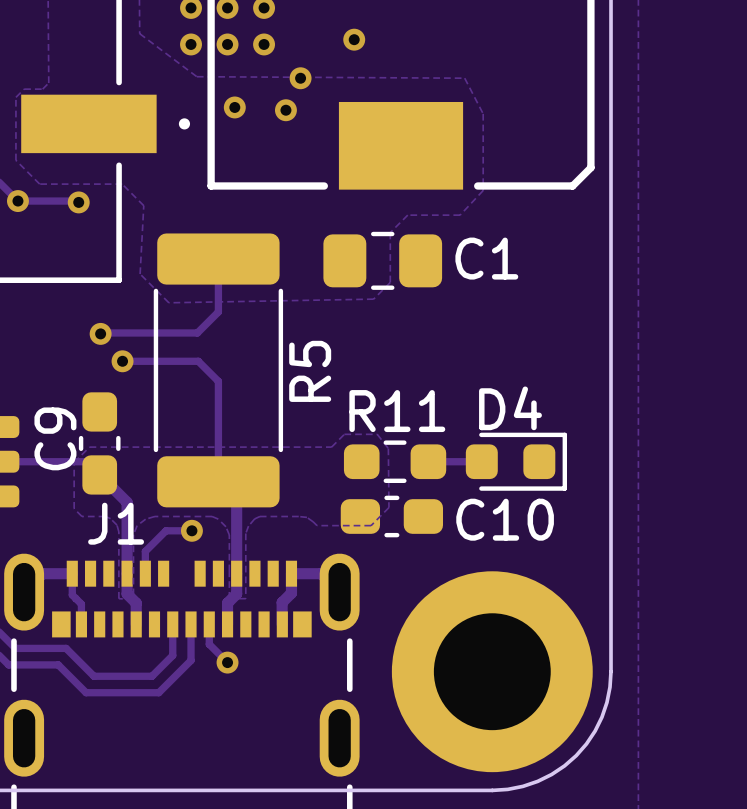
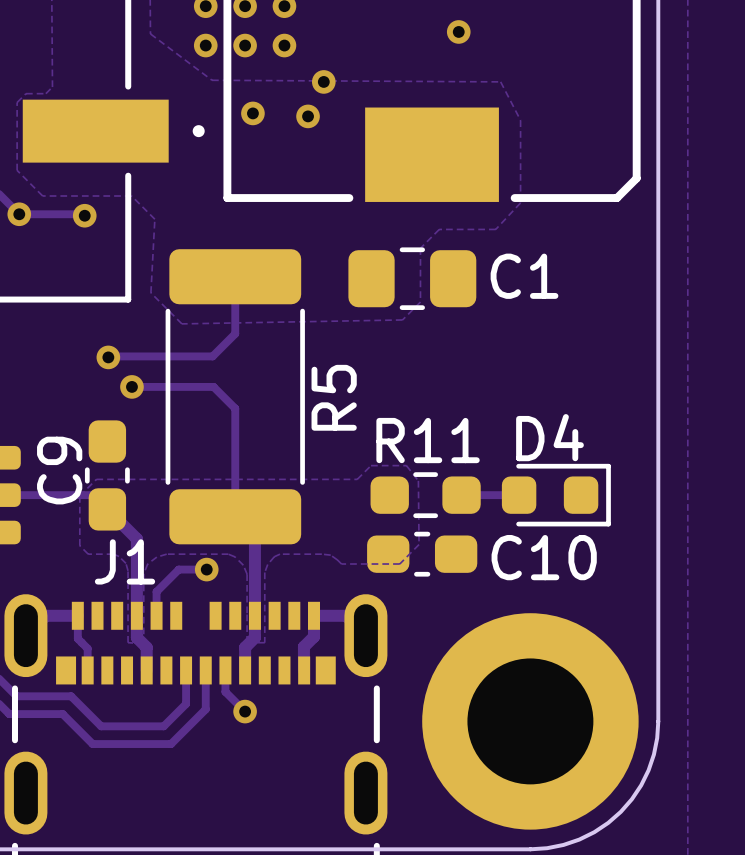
via: none -> (458, 31)
via: (354, 39) -> none

